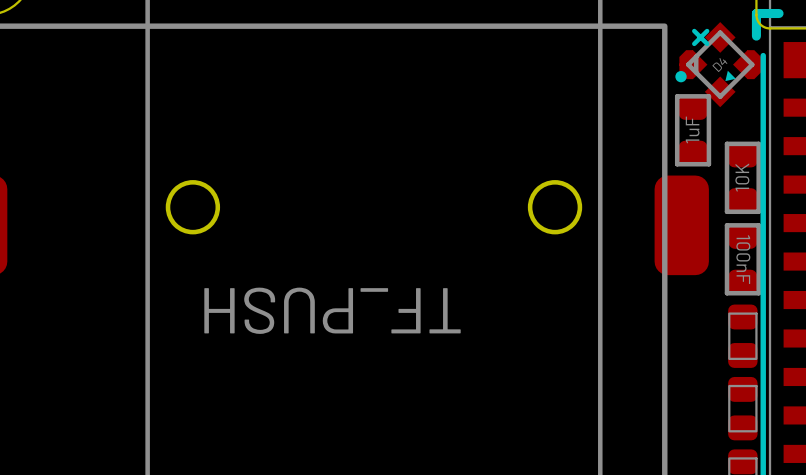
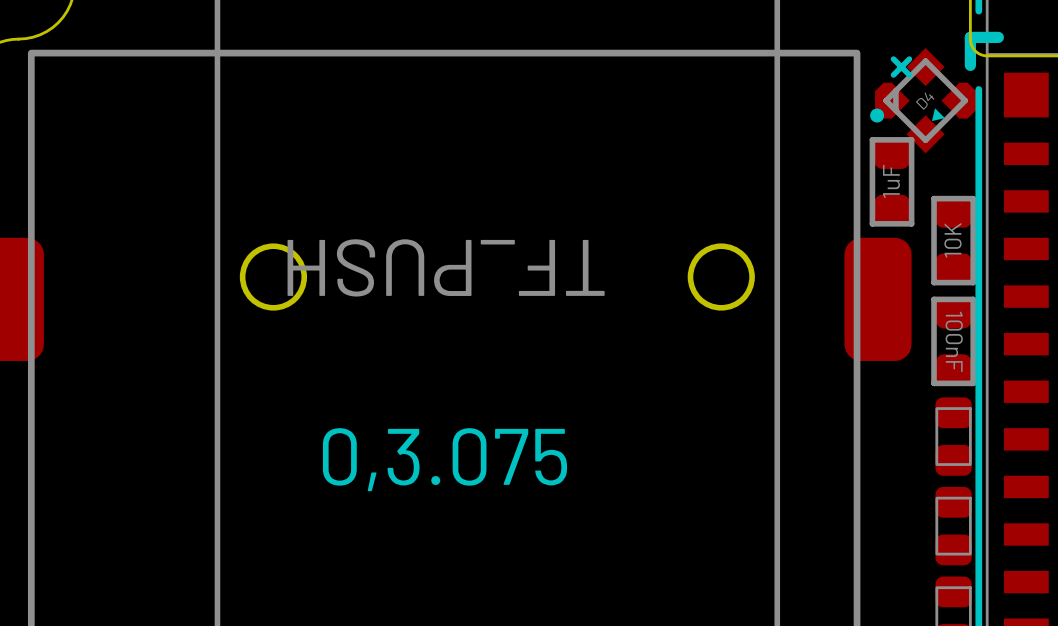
part value position: TF_PUSH (332, 310) -> TF_PUSH (446, 267)
part text: none -> 0,3.075 (445, 459)

